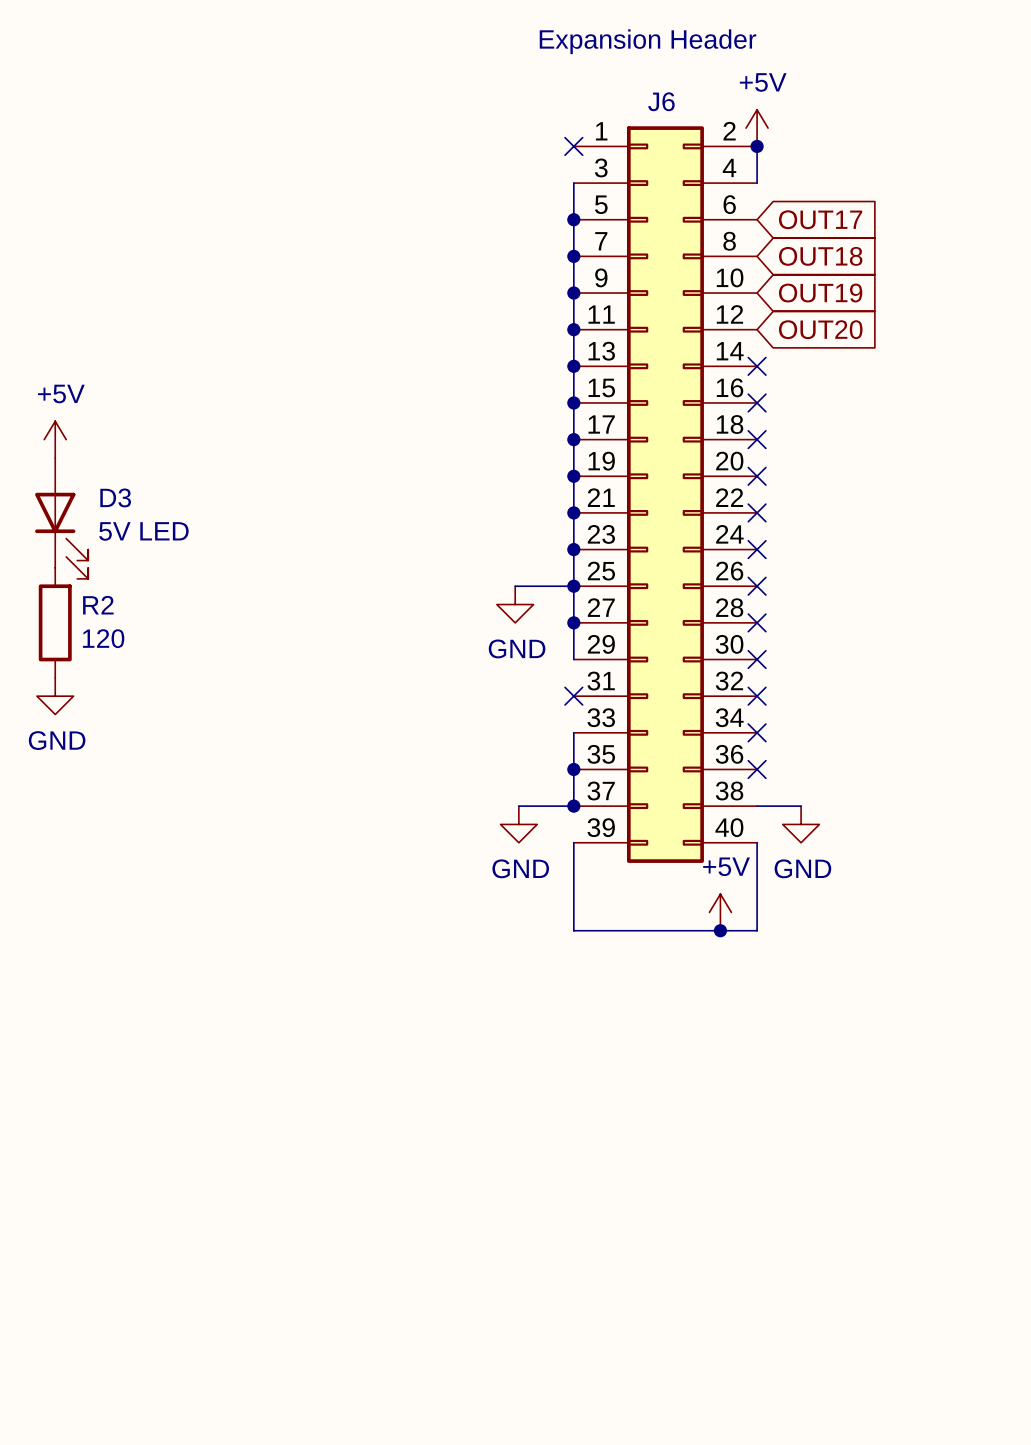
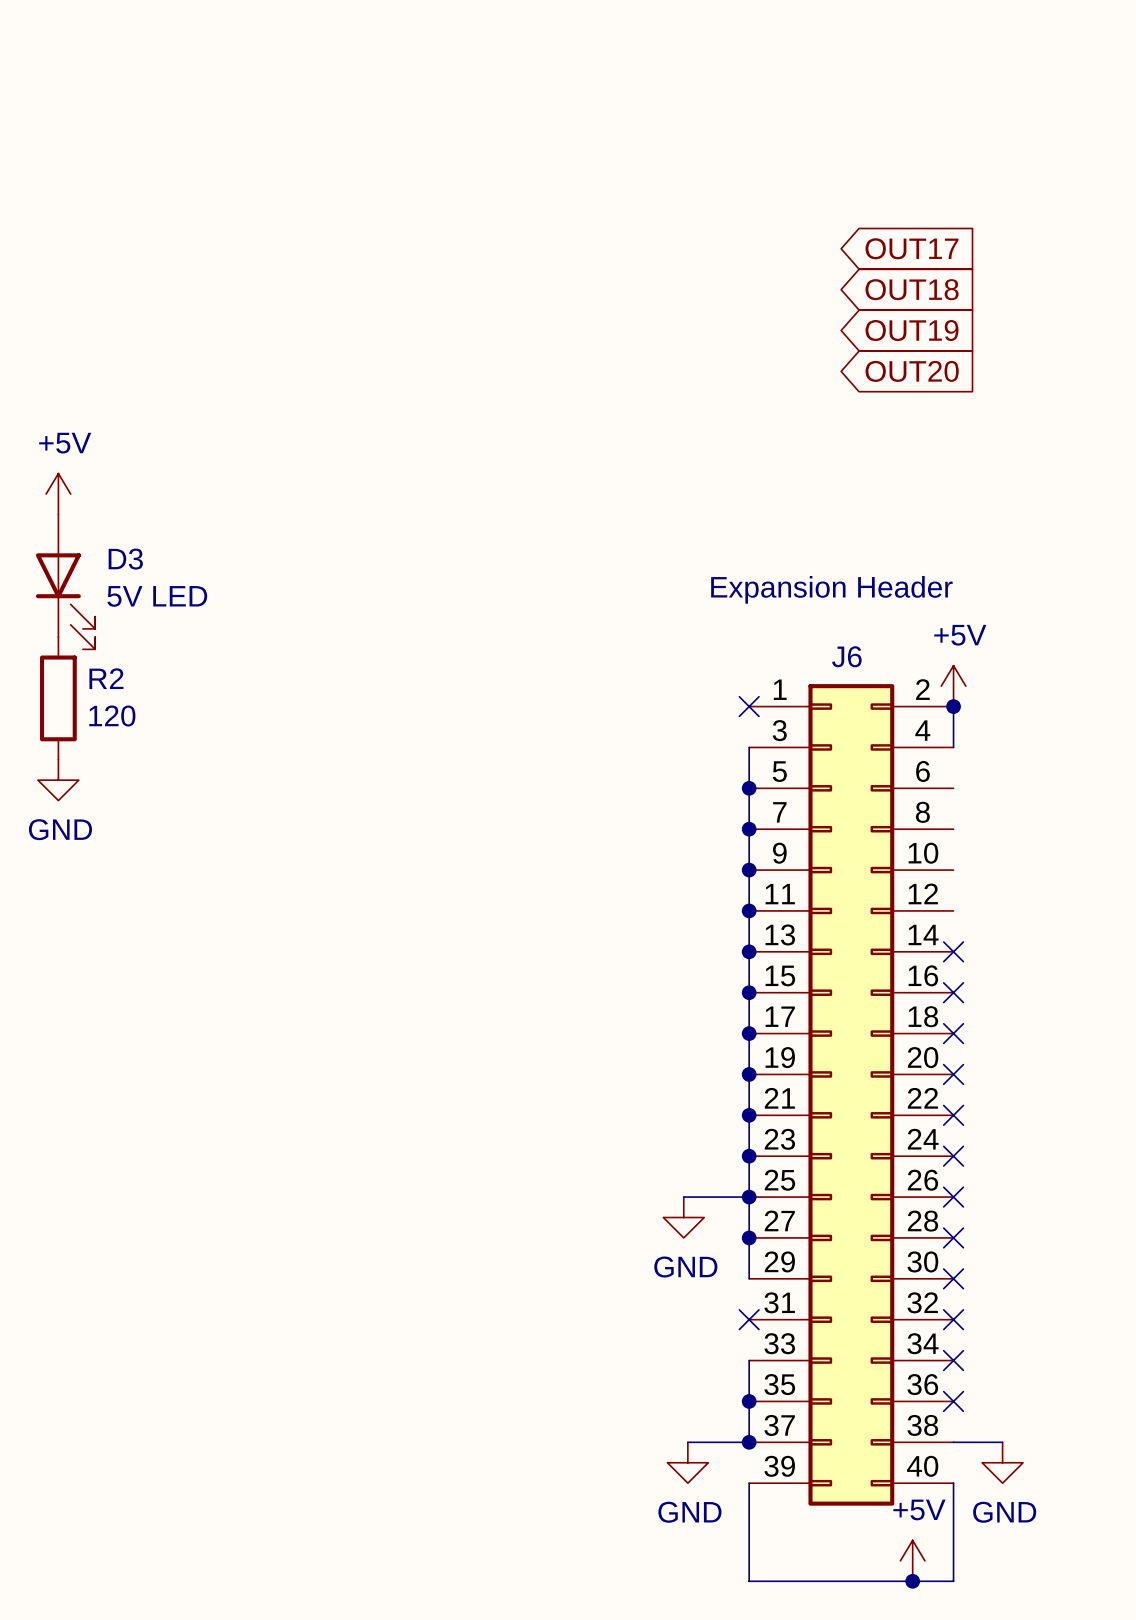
power symbol: +5V (757, 128) -> none
no-connect mark: (573, 146) -> none
wire: (757, 146) (757, 183) -> none
junction: (757, 146) -> none
wire: (573, 183) (573, 659) -> none
junction: (573, 219) -> none
junction: (573, 256) -> none
junction: (573, 293) -> none
junction: (573, 329) -> none
junction: (573, 366) -> none
no-connect mark: (757, 366) -> none
junction: (573, 402) -> none
no-connect mark: (757, 402) -> none
junction: (573, 439) -> none
no-connect mark: (757, 439) -> none
junction: (573, 476) -> none
no-connect mark: (757, 476) -> none
J6 position: (665, 494) -> (851, 1094)
junction: (573, 512) -> none
no-connect mark: (757, 512) -> none
junction: (573, 549) -> none
no-connect mark: (757, 549) -> none
wire: (515, 586) (573, 586) -> none
junction: (573, 586) -> none
no-connect mark: (757, 586) -> none
power symbol: GND (515, 604) -> none
power symbol: none -> +5V (953, 686)
junction: (573, 622) -> none
no-connect mark: (757, 622) -> none
no-connect mark: none -> (749, 706)
wire: none -> (953, 706) (953, 747)
junction: none -> (953, 706)
no-connect mark: (757, 659) -> none
wire: none -> (749, 747) (749, 1278)
no-connect mark: (573, 696) -> none
no-connect mark: (757, 696) -> none
junction: none -> (749, 788)
wire: (573, 732) (573, 806) (518, 806) -> none
no-connect mark: (757, 732) -> none
junction: none -> (749, 829)
junction: (573, 769) -> none
no-connect mark: (757, 769) -> none
junction: none -> (749, 870)
junction: (573, 806) -> none
junction: none -> (749, 910)
power symbol: GND (518, 824) -> none
power symbol: GND (801, 824) -> none
wire: (573, 842) (573, 930) (757, 930) (757, 842) -> none
junction: none -> (749, 951)
no-connect mark: none -> (953, 951)
junction: none -> (749, 992)
no-connect mark: none -> (953, 992)
power symbol: +5V (720, 912) -> none
junction: none -> (749, 1033)
no-connect mark: none -> (953, 1033)
junction: (720, 930) -> none
junction: none -> (749, 1074)
no-connect mark: none -> (953, 1074)
junction: none -> (749, 1115)
no-connect mark: none -> (953, 1115)
junction: none -> (749, 1156)
no-connect mark: none -> (953, 1156)
wire: none -> (683, 1197) (749, 1197)
junction: none -> (749, 1197)
no-connect mark: none -> (953, 1197)
power symbol: none -> GND (683, 1217)
junction: none -> (749, 1237)
no-connect mark: none -> (953, 1237)
no-connect mark: none -> (953, 1278)
no-connect mark: none -> (749, 1319)
no-connect mark: none -> (953, 1319)
wire: none -> (749, 1360) (749, 1442) (687, 1442)
no-connect mark: none -> (953, 1360)
junction: none -> (749, 1401)
no-connect mark: none -> (953, 1401)
junction: none -> (749, 1442)
wire: none -> (953, 1442) (1002, 1442)
power symbol: none -> GND (687, 1462)
power symbol: none -> GND (1002, 1462)
wire: none -> (749, 1483) (749, 1581) (953, 1581) (953, 1483)
power symbol: none -> +5V (912, 1560)
junction: none -> (912, 1581)

